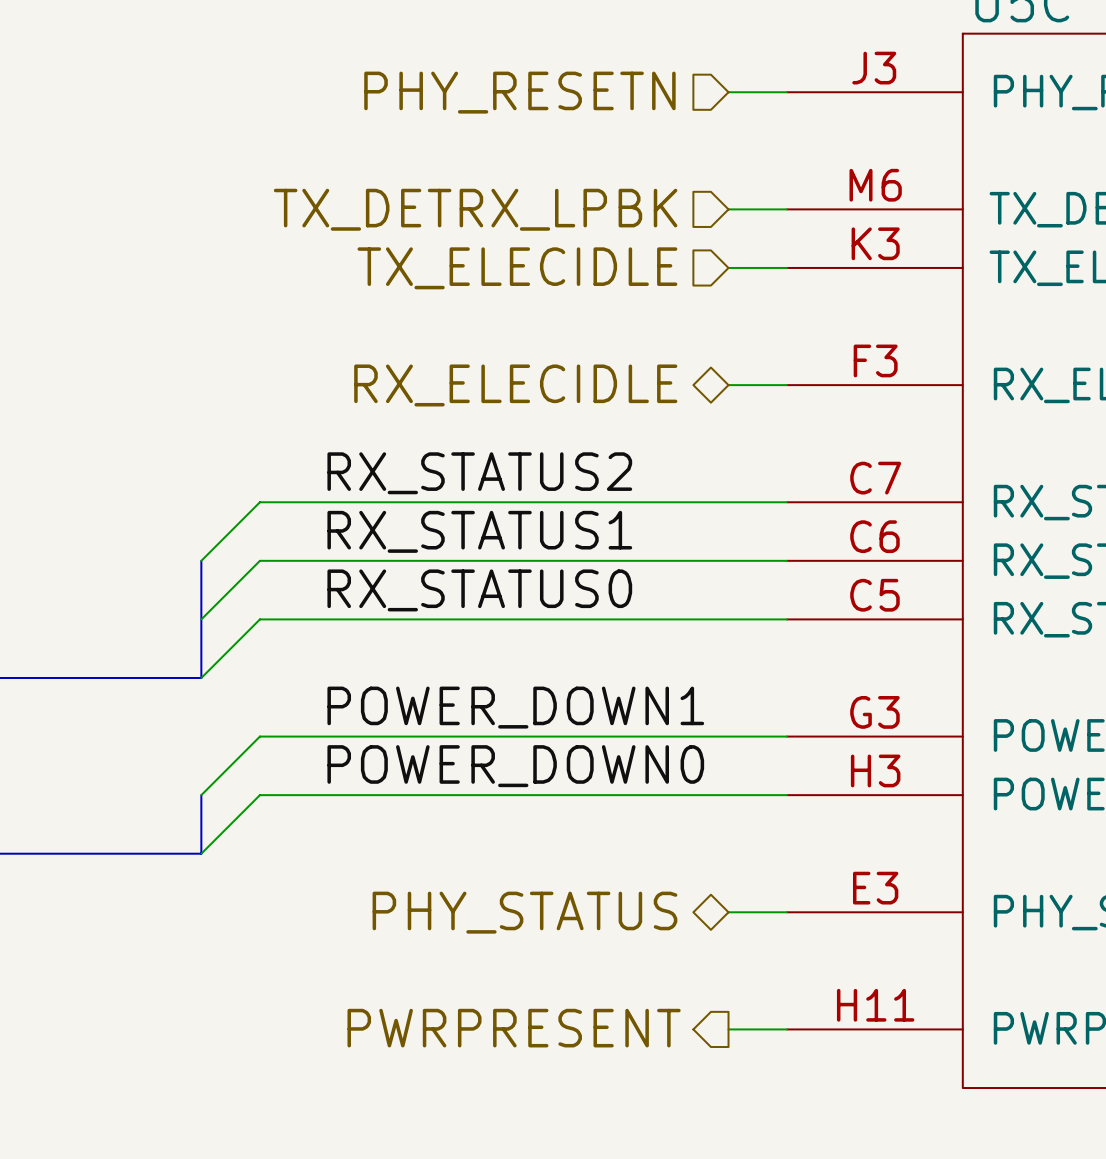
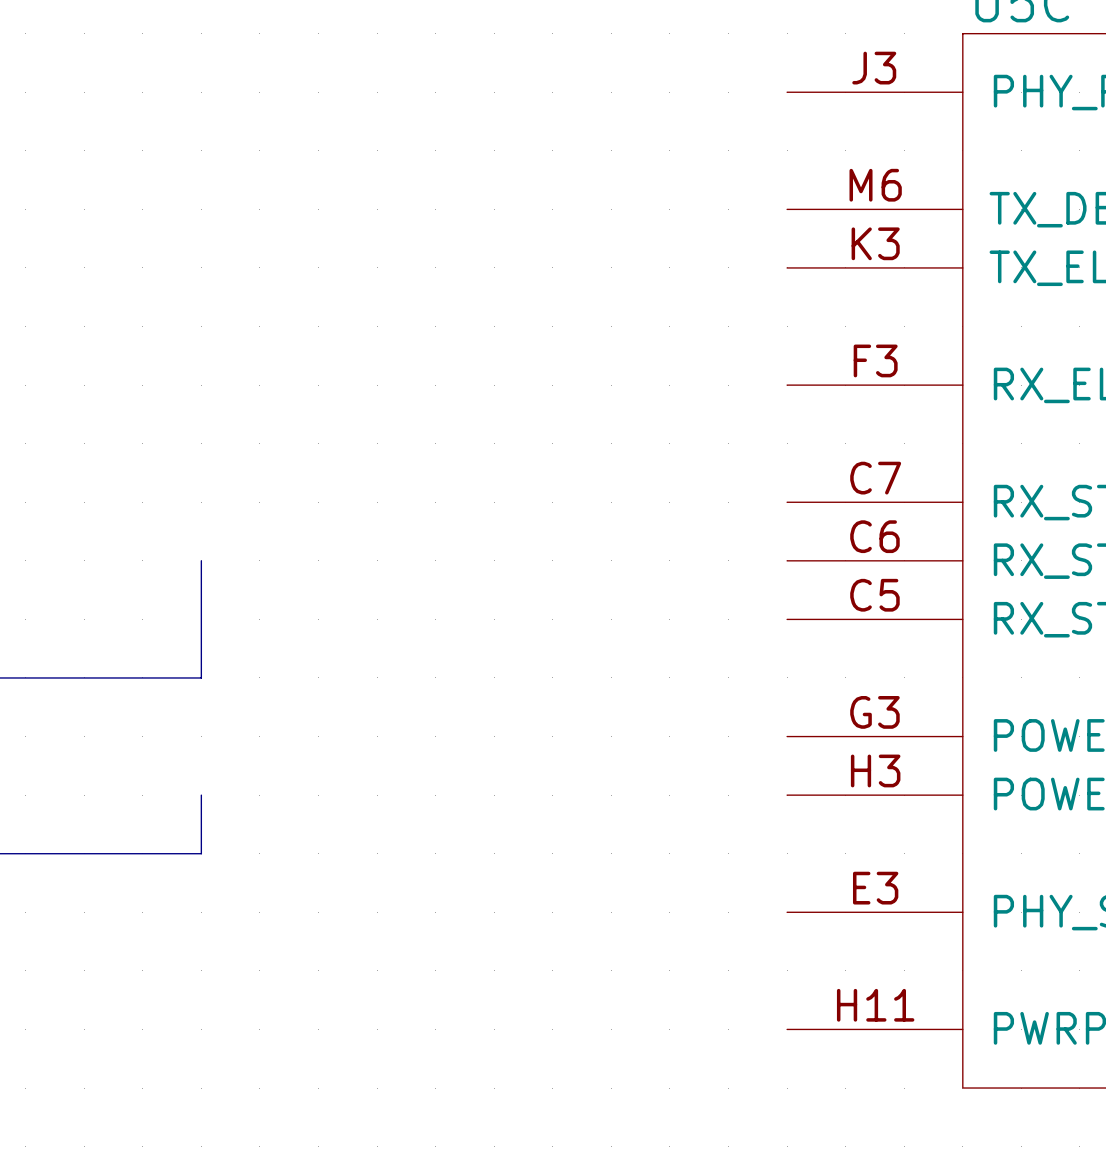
hierarchical label: PHY_RESETN (519, 92) -> none
wire: (728, 92) (787, 92) -> none
hierarchical label: TX_DETRX_LPBK (475, 209) -> none
wire: (728, 209) (787, 209) -> none
wire: (728, 267) (787, 267) -> none
hierarchical label: TX_ELECIDLE (517, 268) -> none
hierarchical label: RX_ELECIDLE (515, 385) -> none
wire: (728, 385) (787, 385) -> none
label: RX_STATUS2 (479, 473) -> none
wire: (787, 502) (259, 502) (201, 560) -> none
label: RX_STATUS1 (479, 531) -> none
wire: (787, 560) (259, 560) (201, 619) -> none
label: RX_STATUS0 (479, 590) -> none
wire: (787, 619) (259, 619) (201, 677) -> none
label: POWER_DOWN1 (515, 707) -> none
wire: (787, 736) (259, 736) (201, 795) -> none
label: POWER_DOWN0 (515, 766) -> none
wire: (787, 795) (259, 795) (201, 853) -> none
hierarchical label: PHY_STATUS (524, 912) -> none
wire: (728, 912) (787, 912) -> none
hierarchical label: PWRPRESENT (514, 1028) -> none
wire: (728, 1029) (787, 1029) -> none

